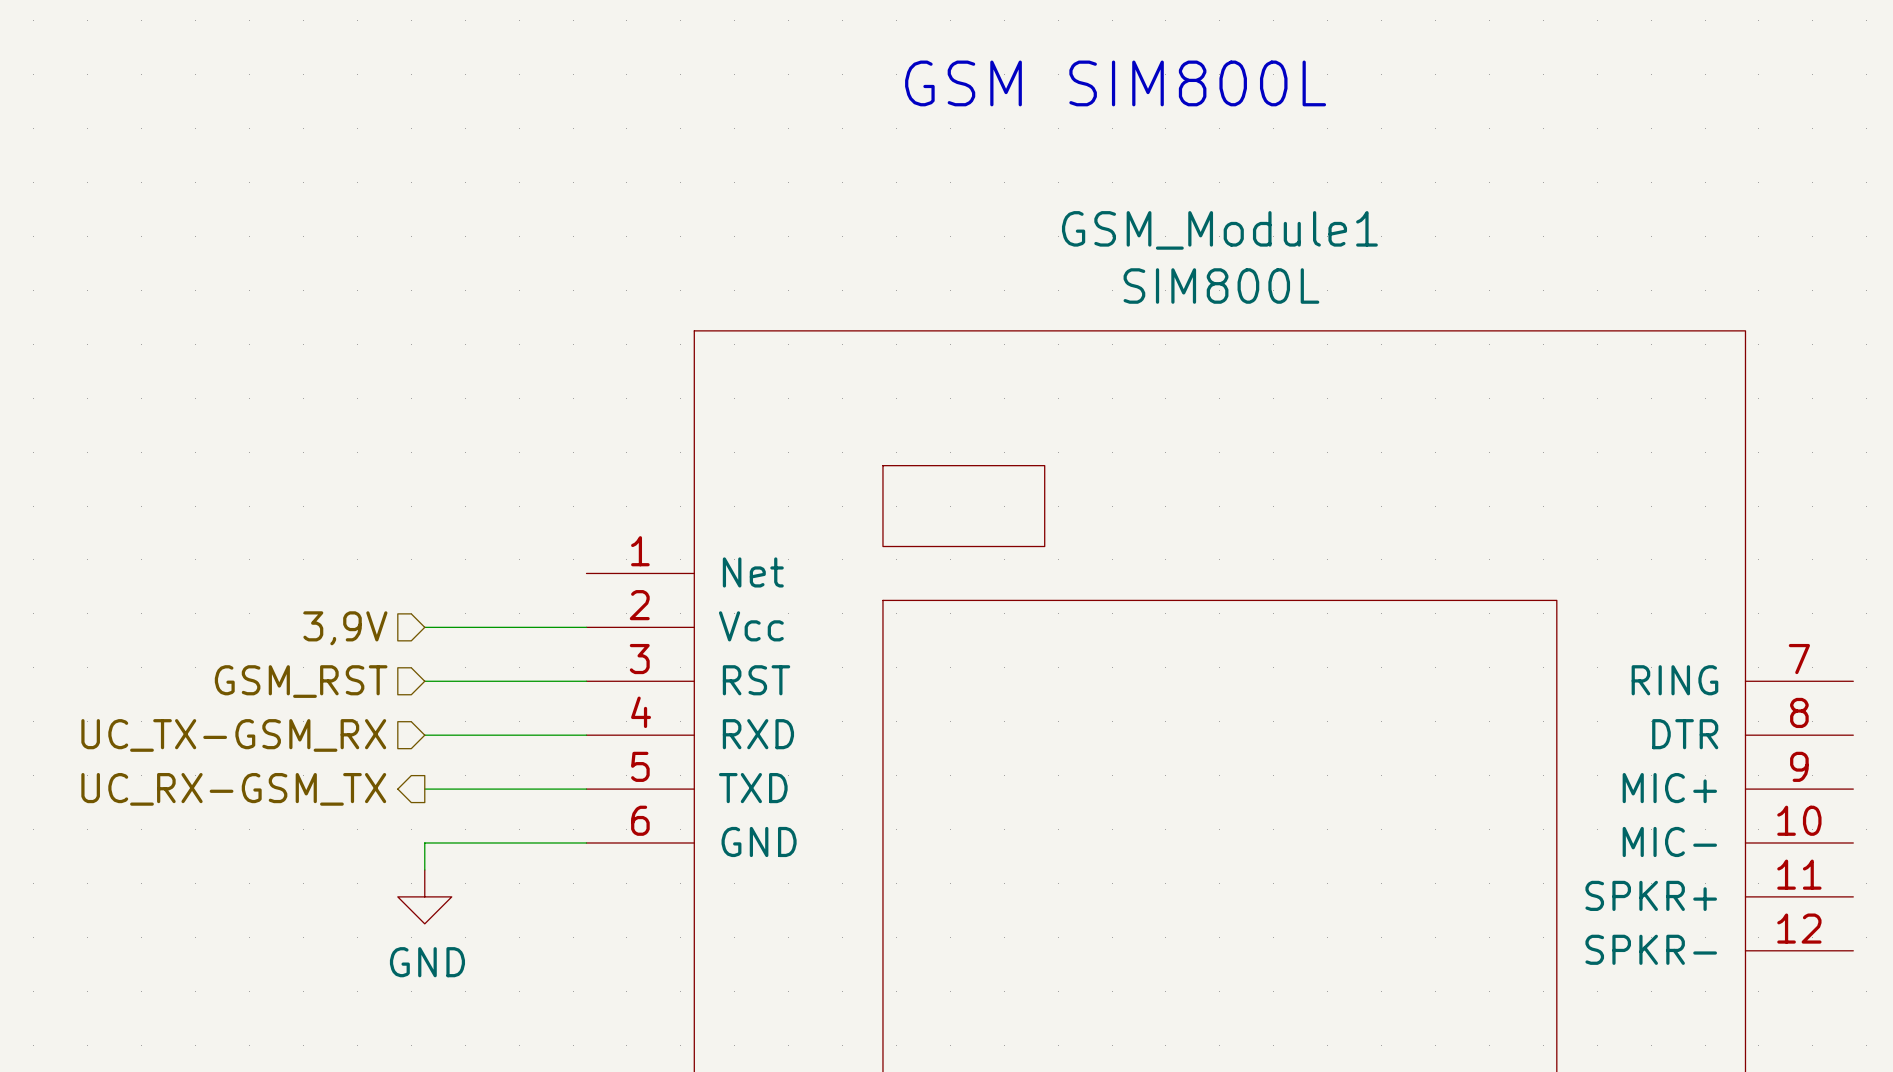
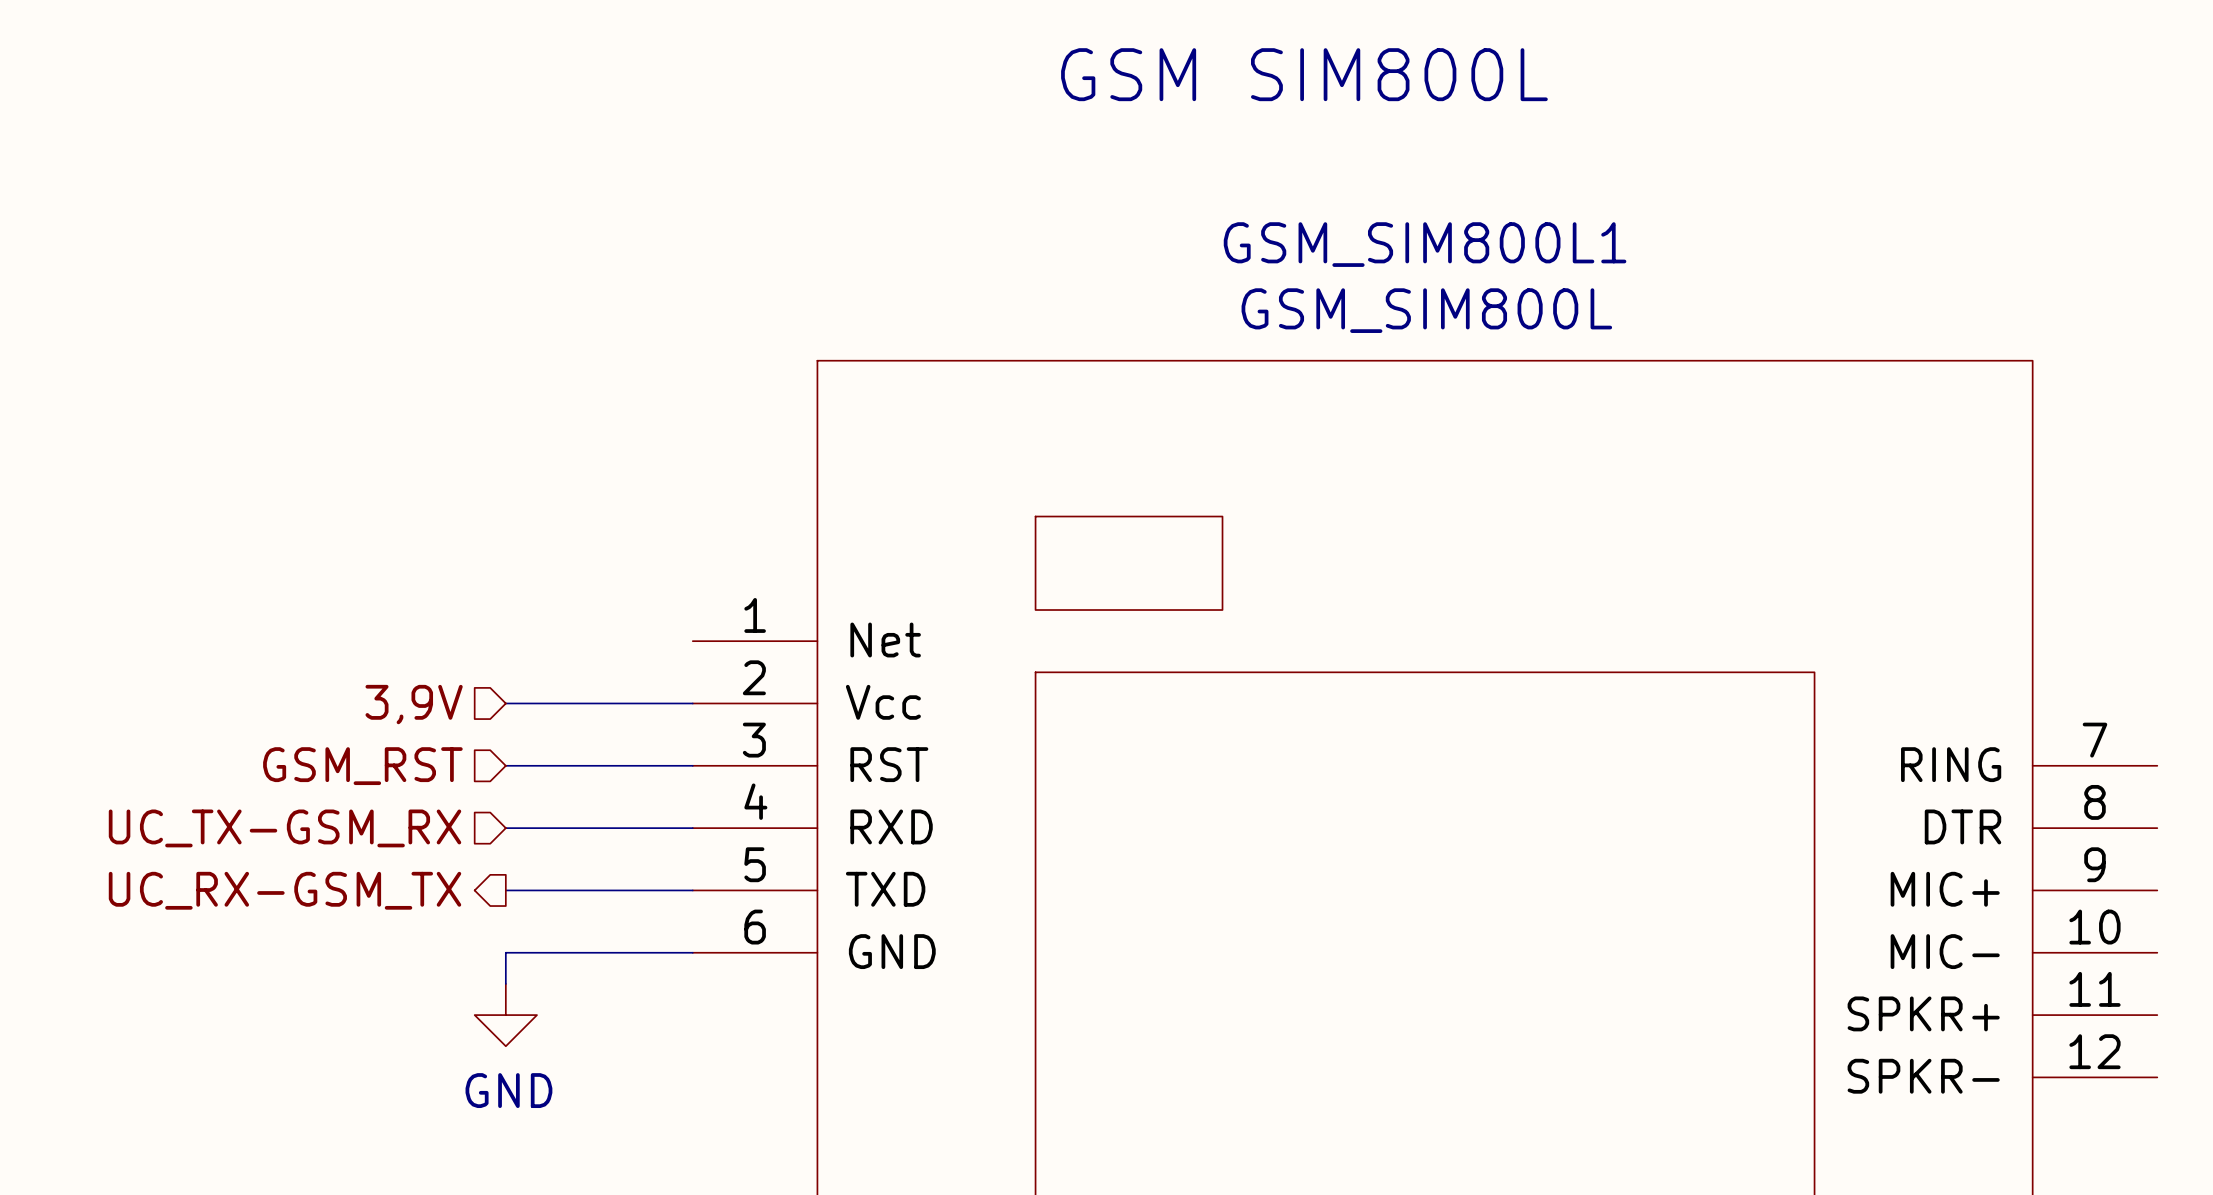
GSM_Module1 name: GSM_Module1 (1219, 230) -> GSM_SIM800L1 (1425, 244)
GSM_Module1 value: SIM800L (1221, 286) -> GSM_SIM800L (1426, 310)

